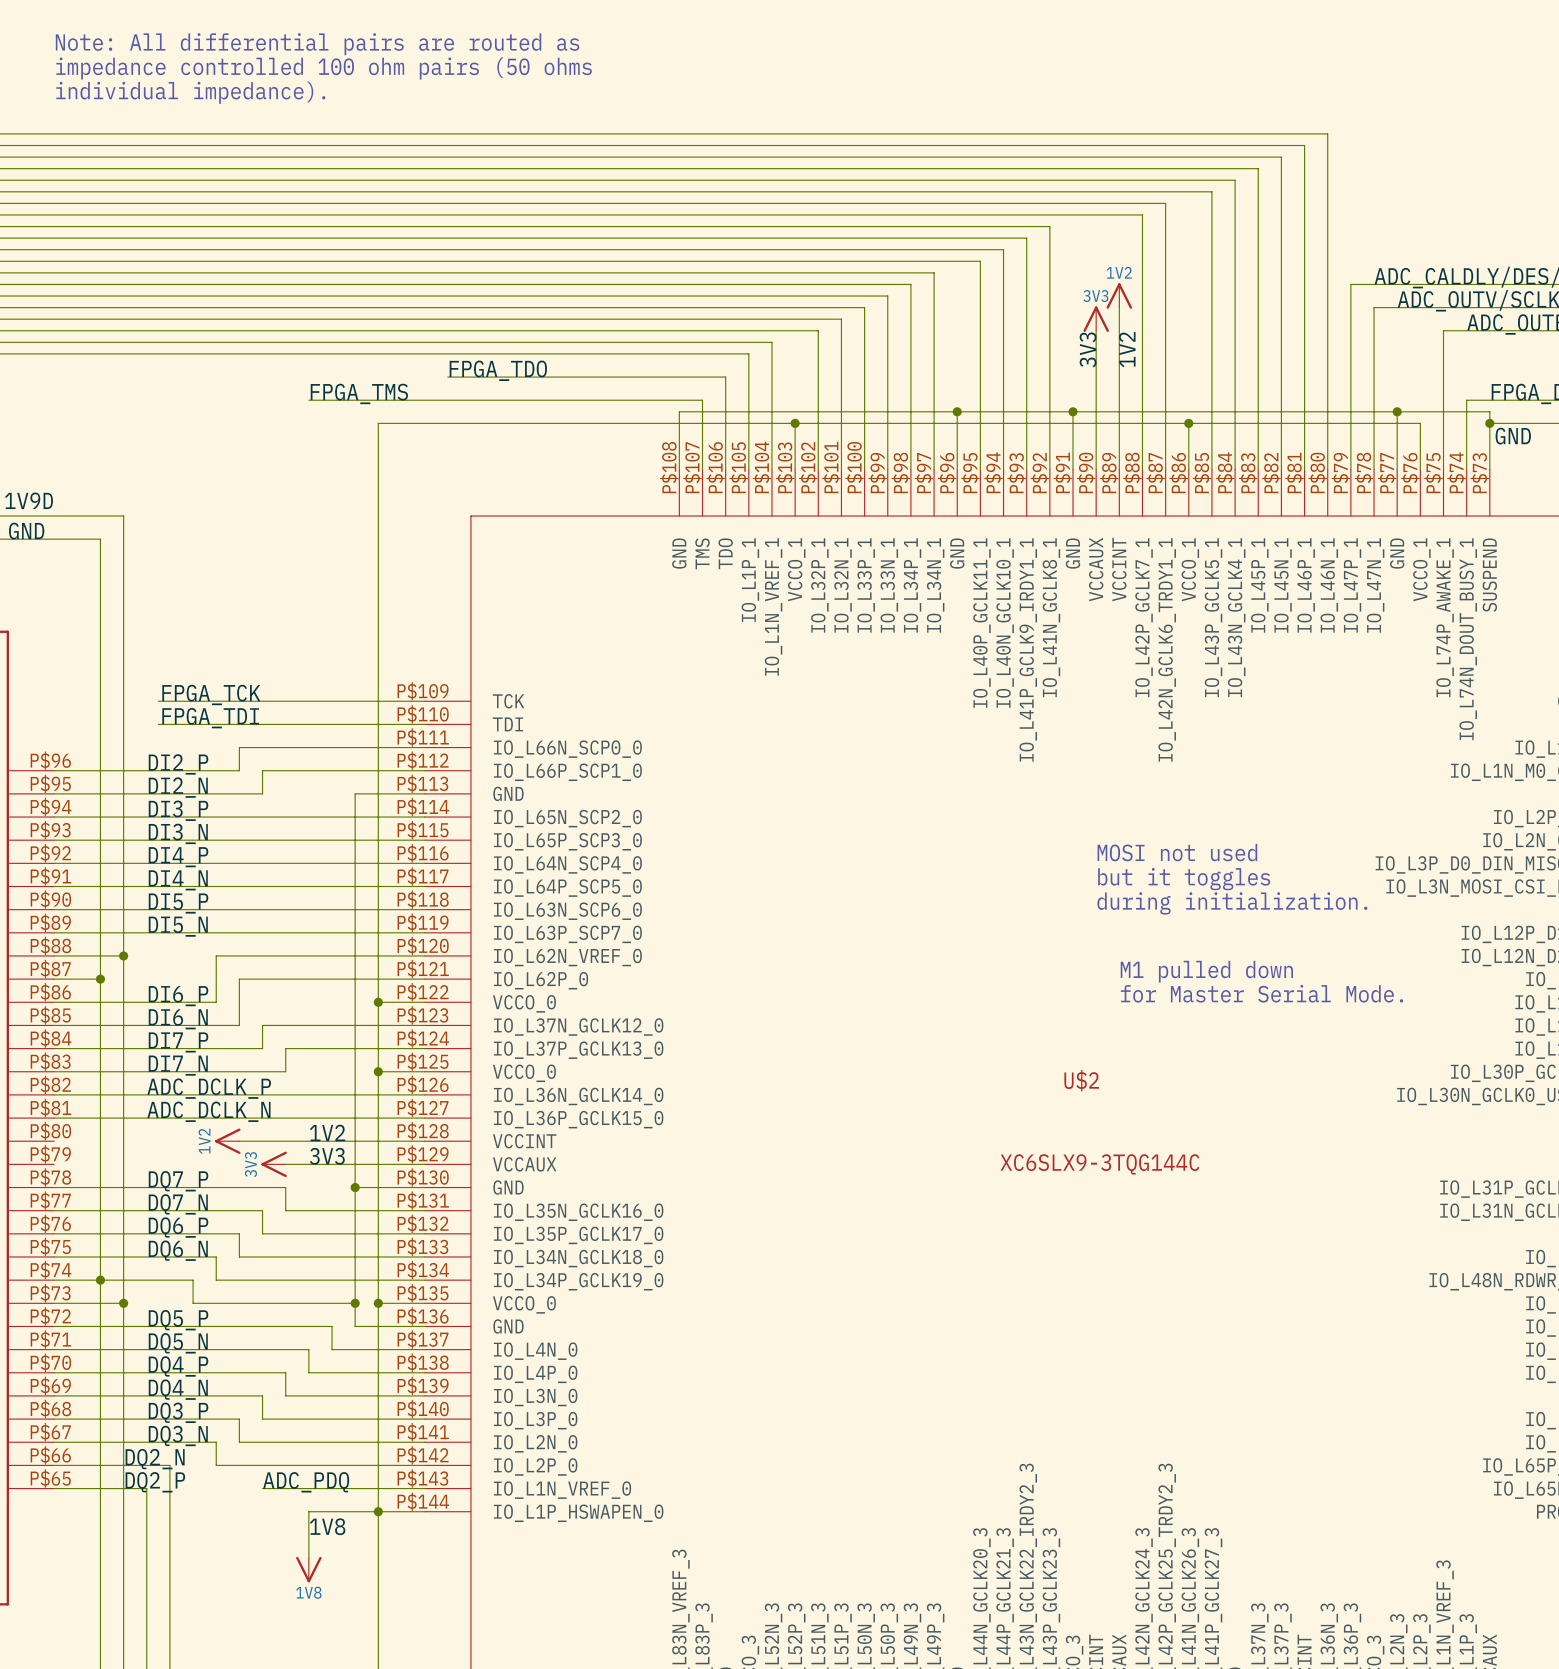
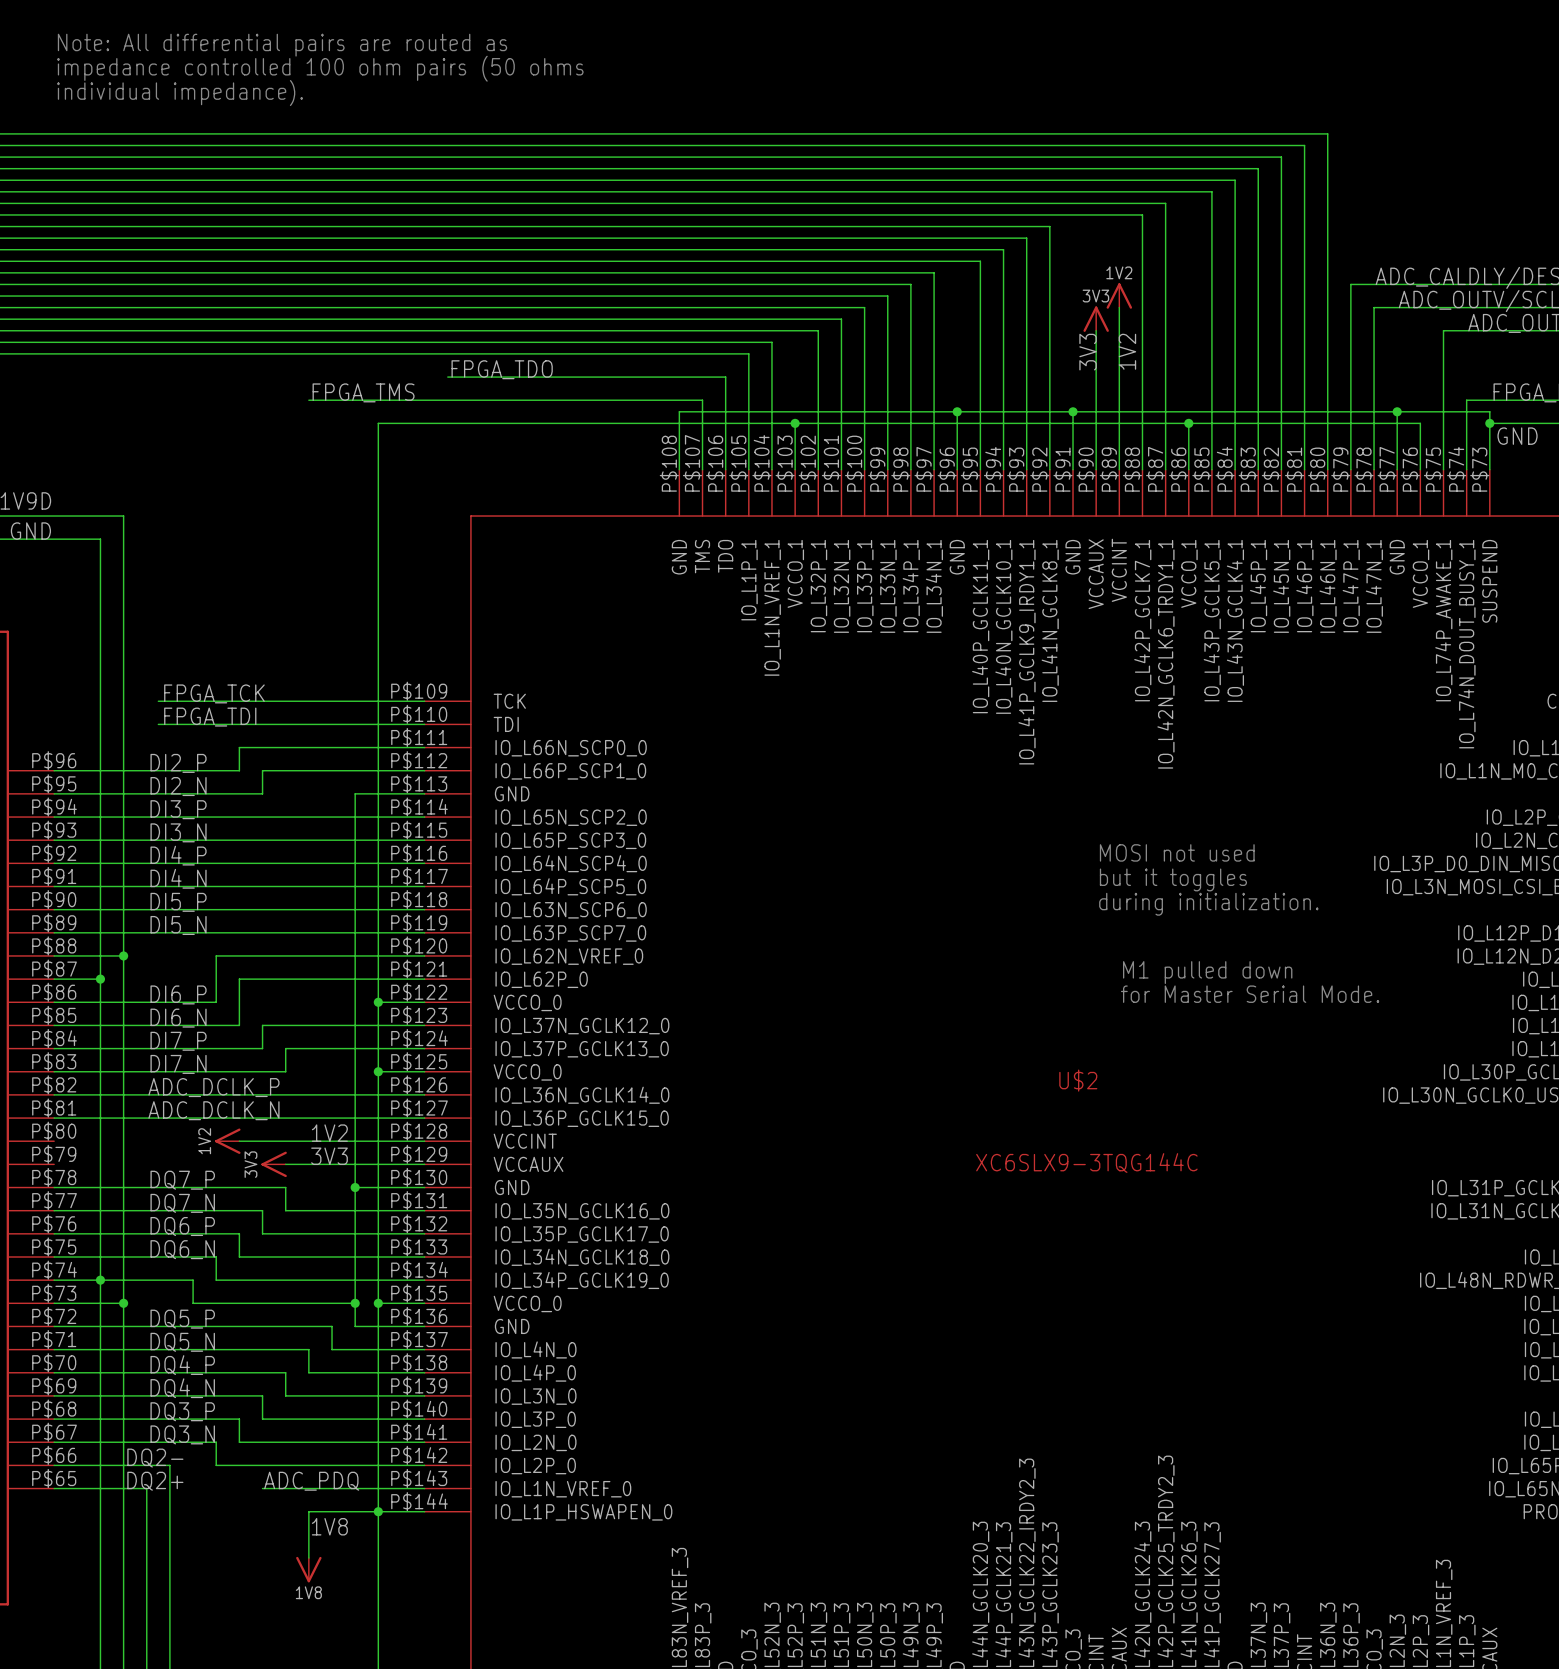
label: DQ2_N (155, 1459) -> DQ2- (155, 1458)
label: DQ2_P (155, 1482) -> DQ2+ (155, 1481)

